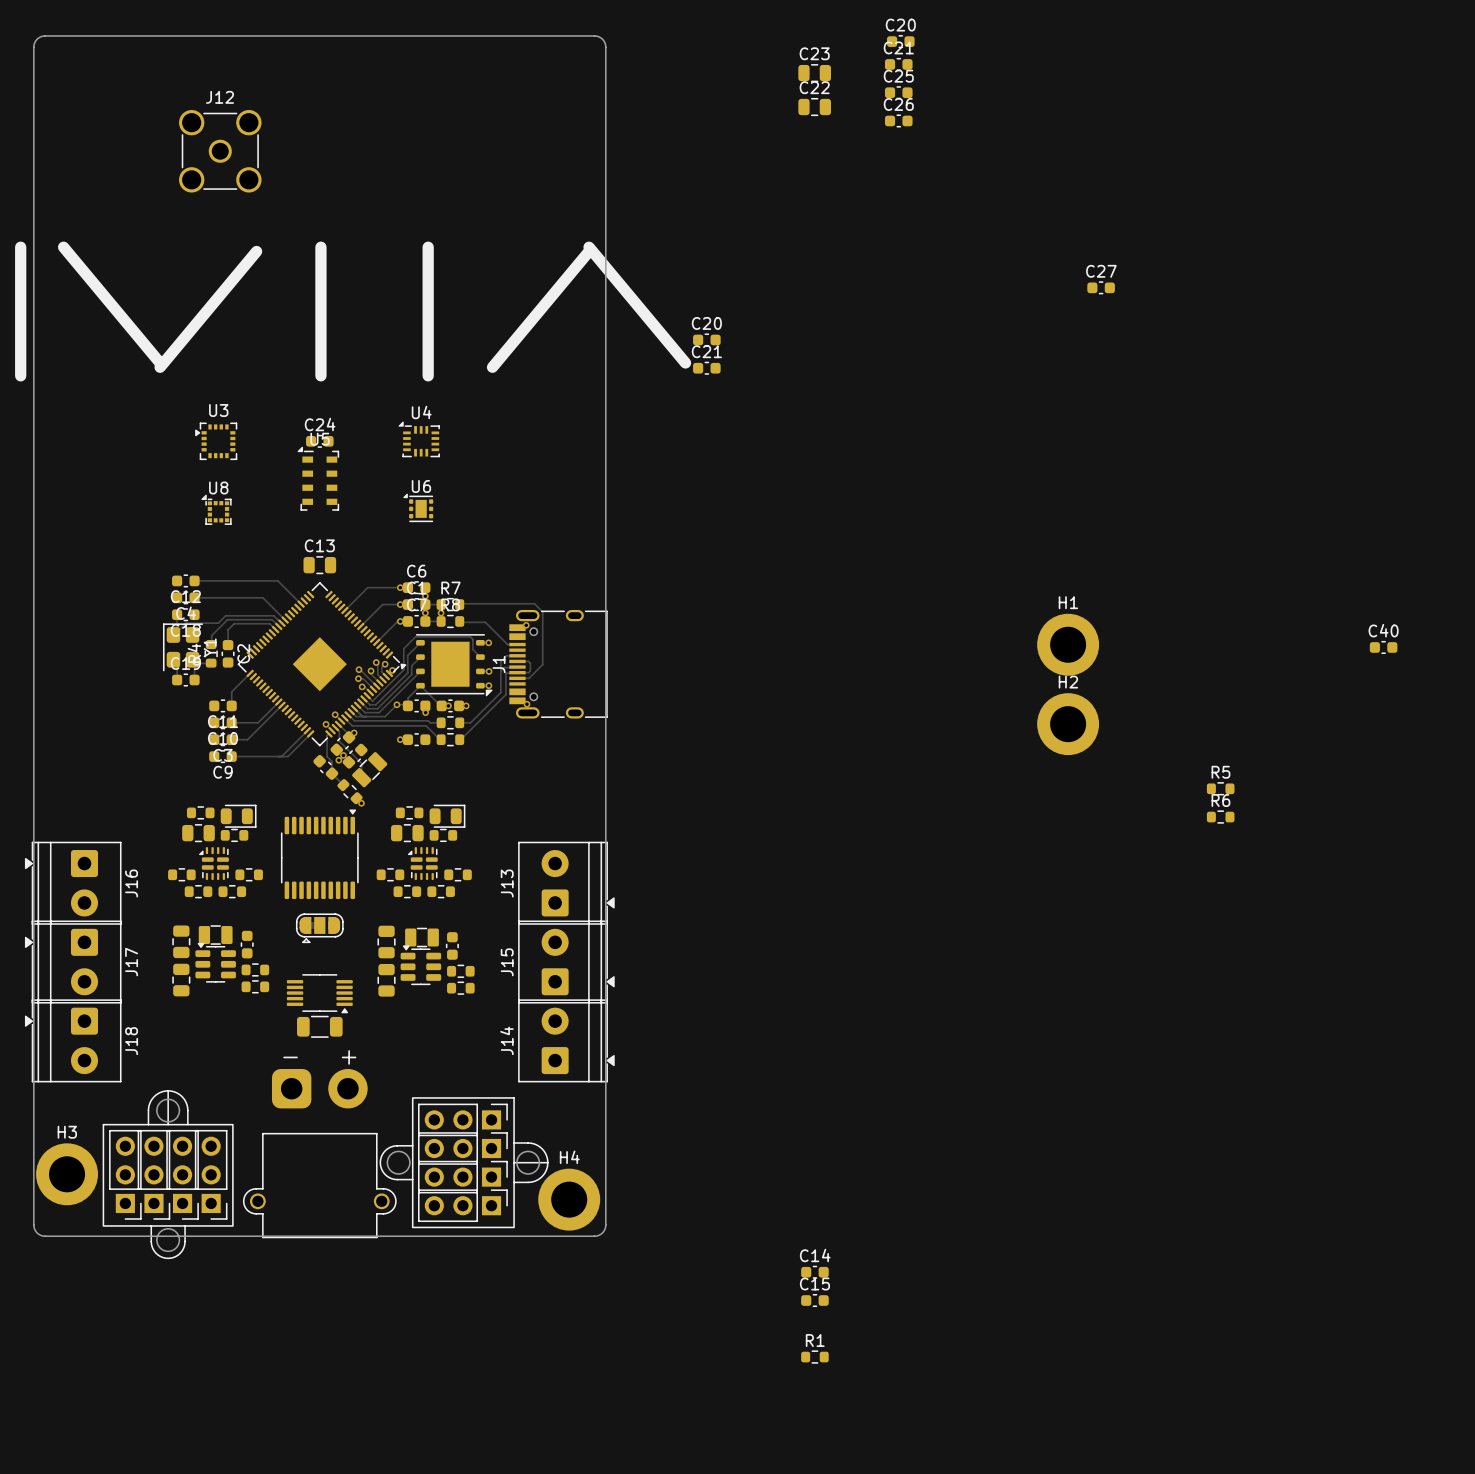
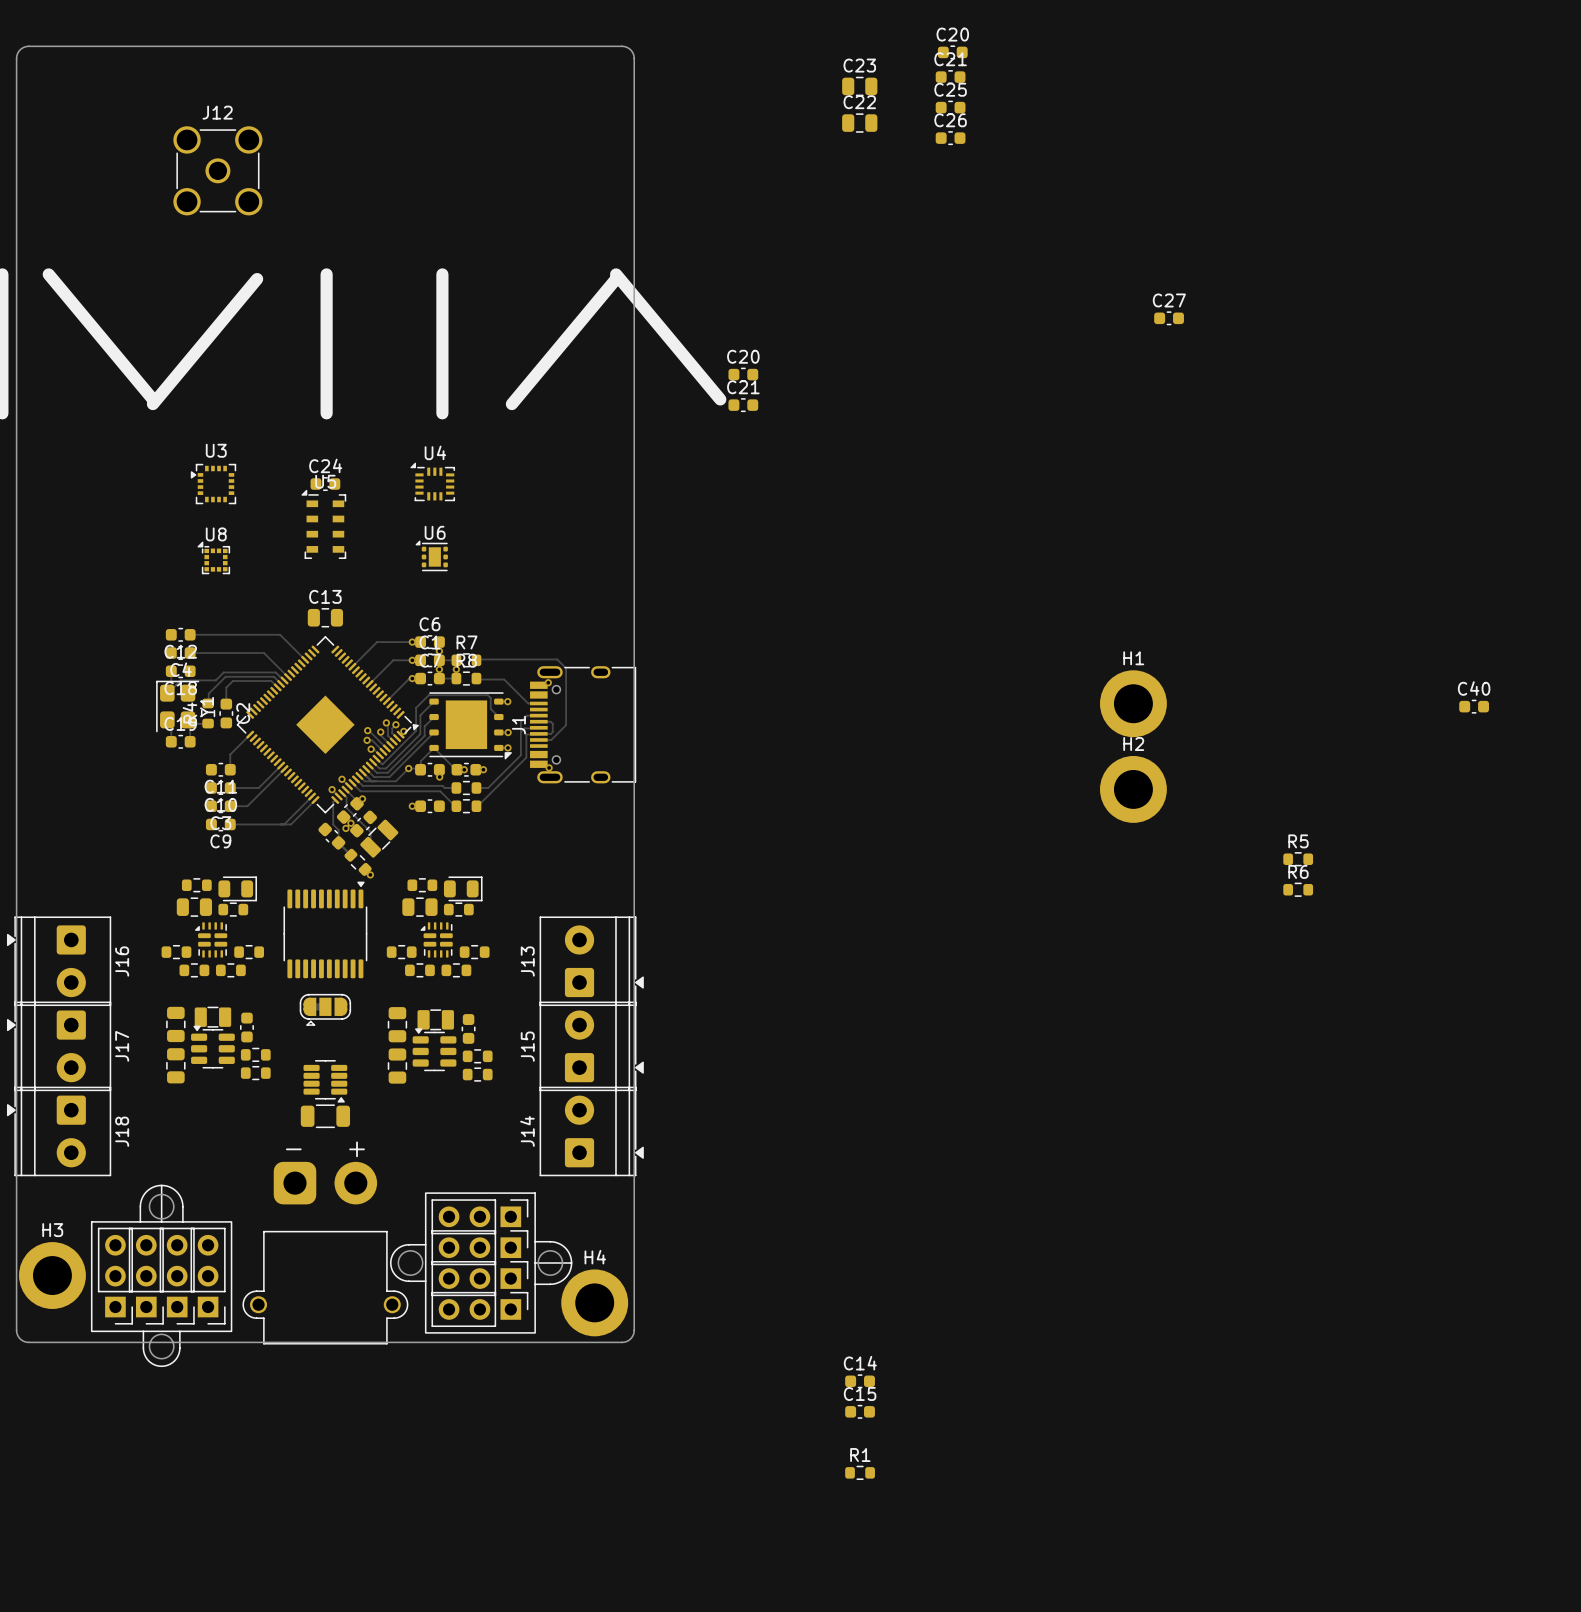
part footprint: [286, 974, 353, 1014] -> [303, 1060, 348, 1103]

